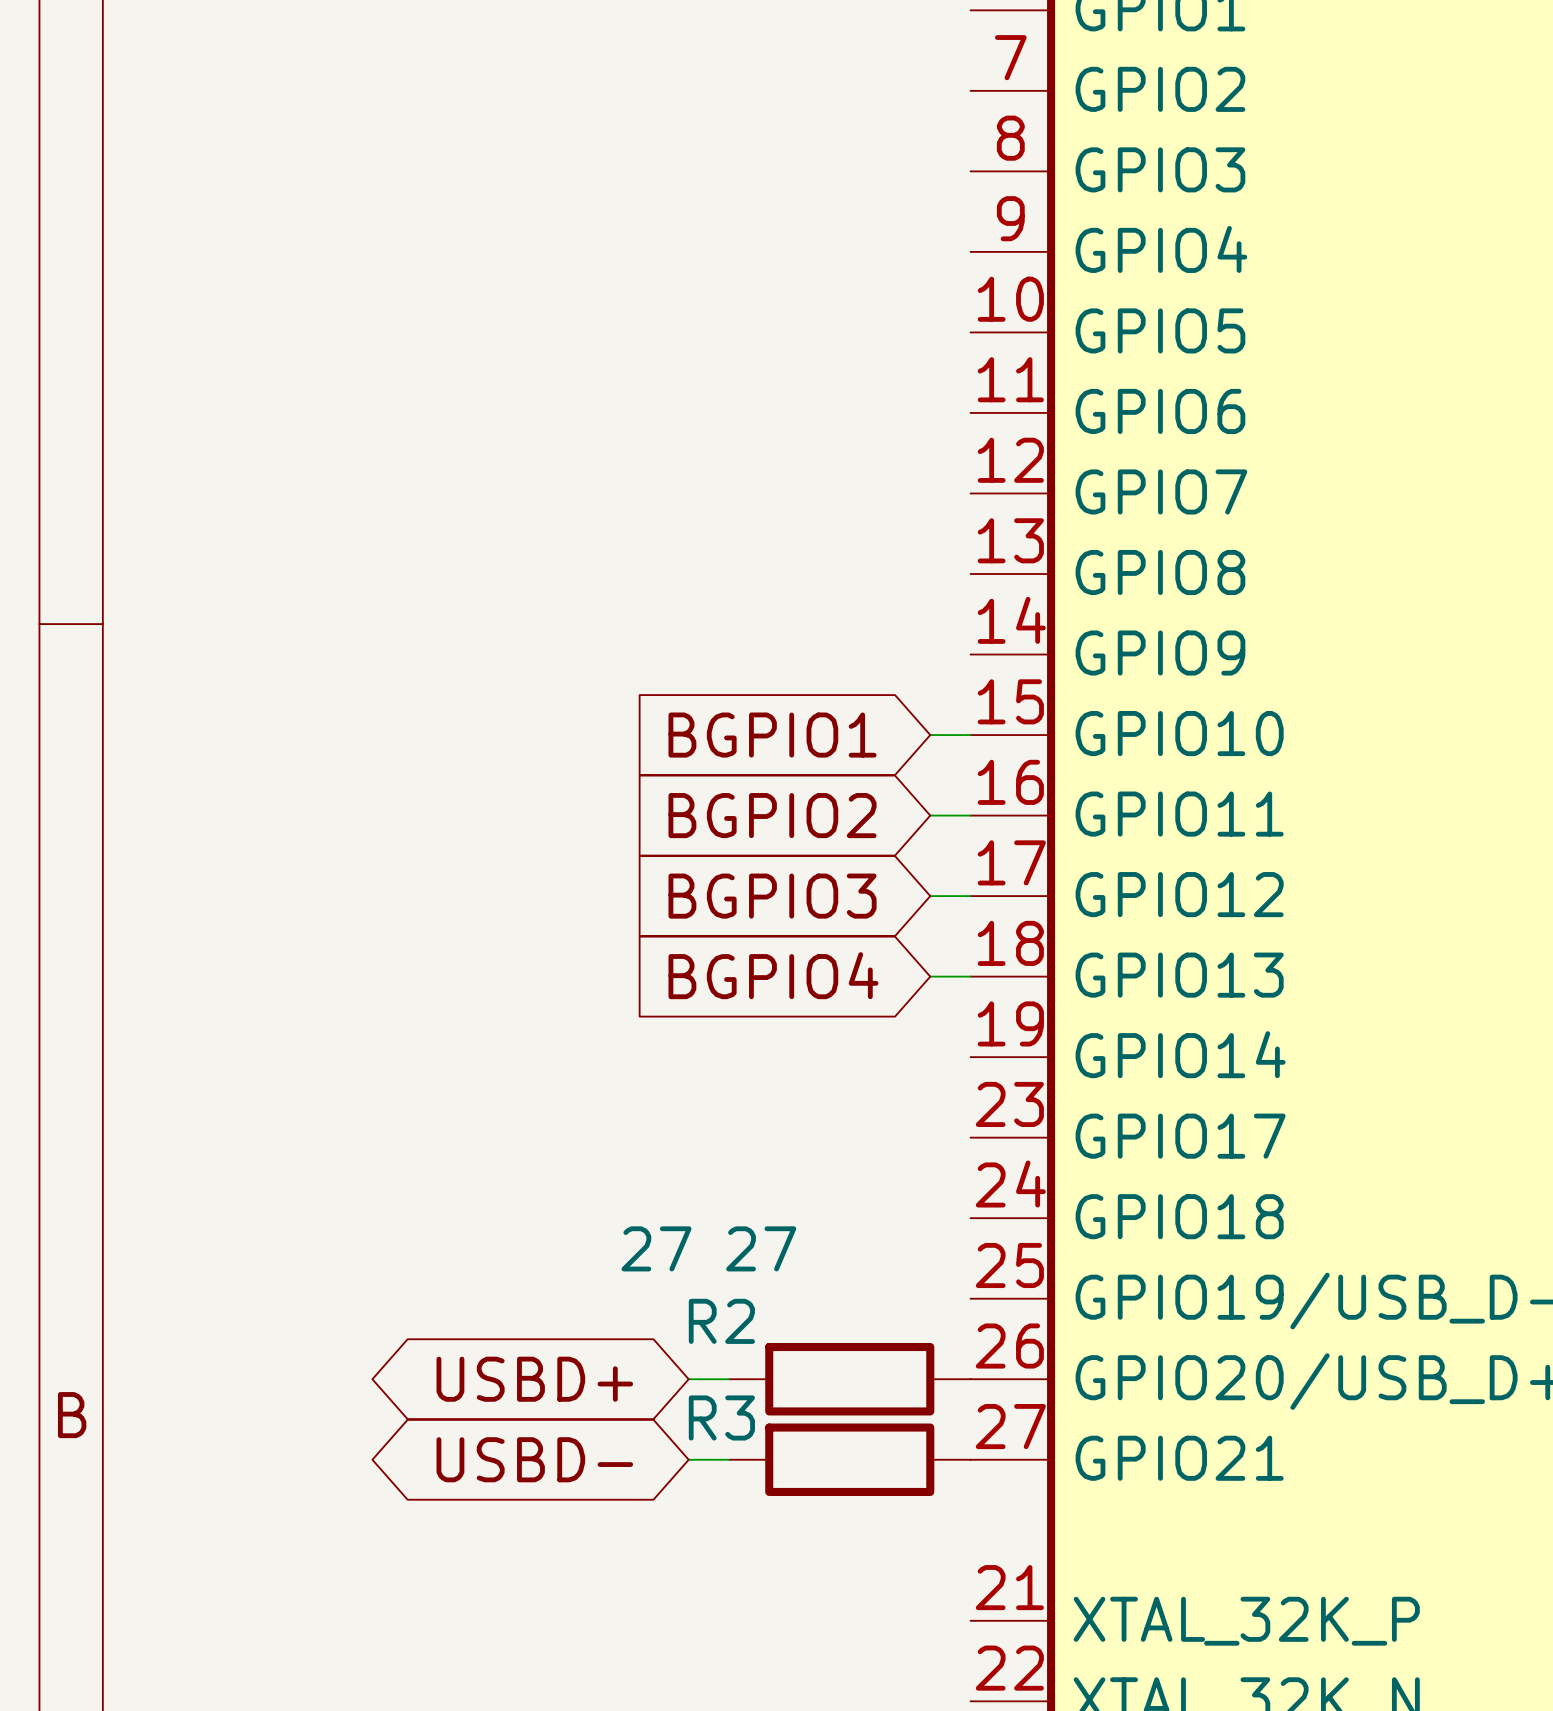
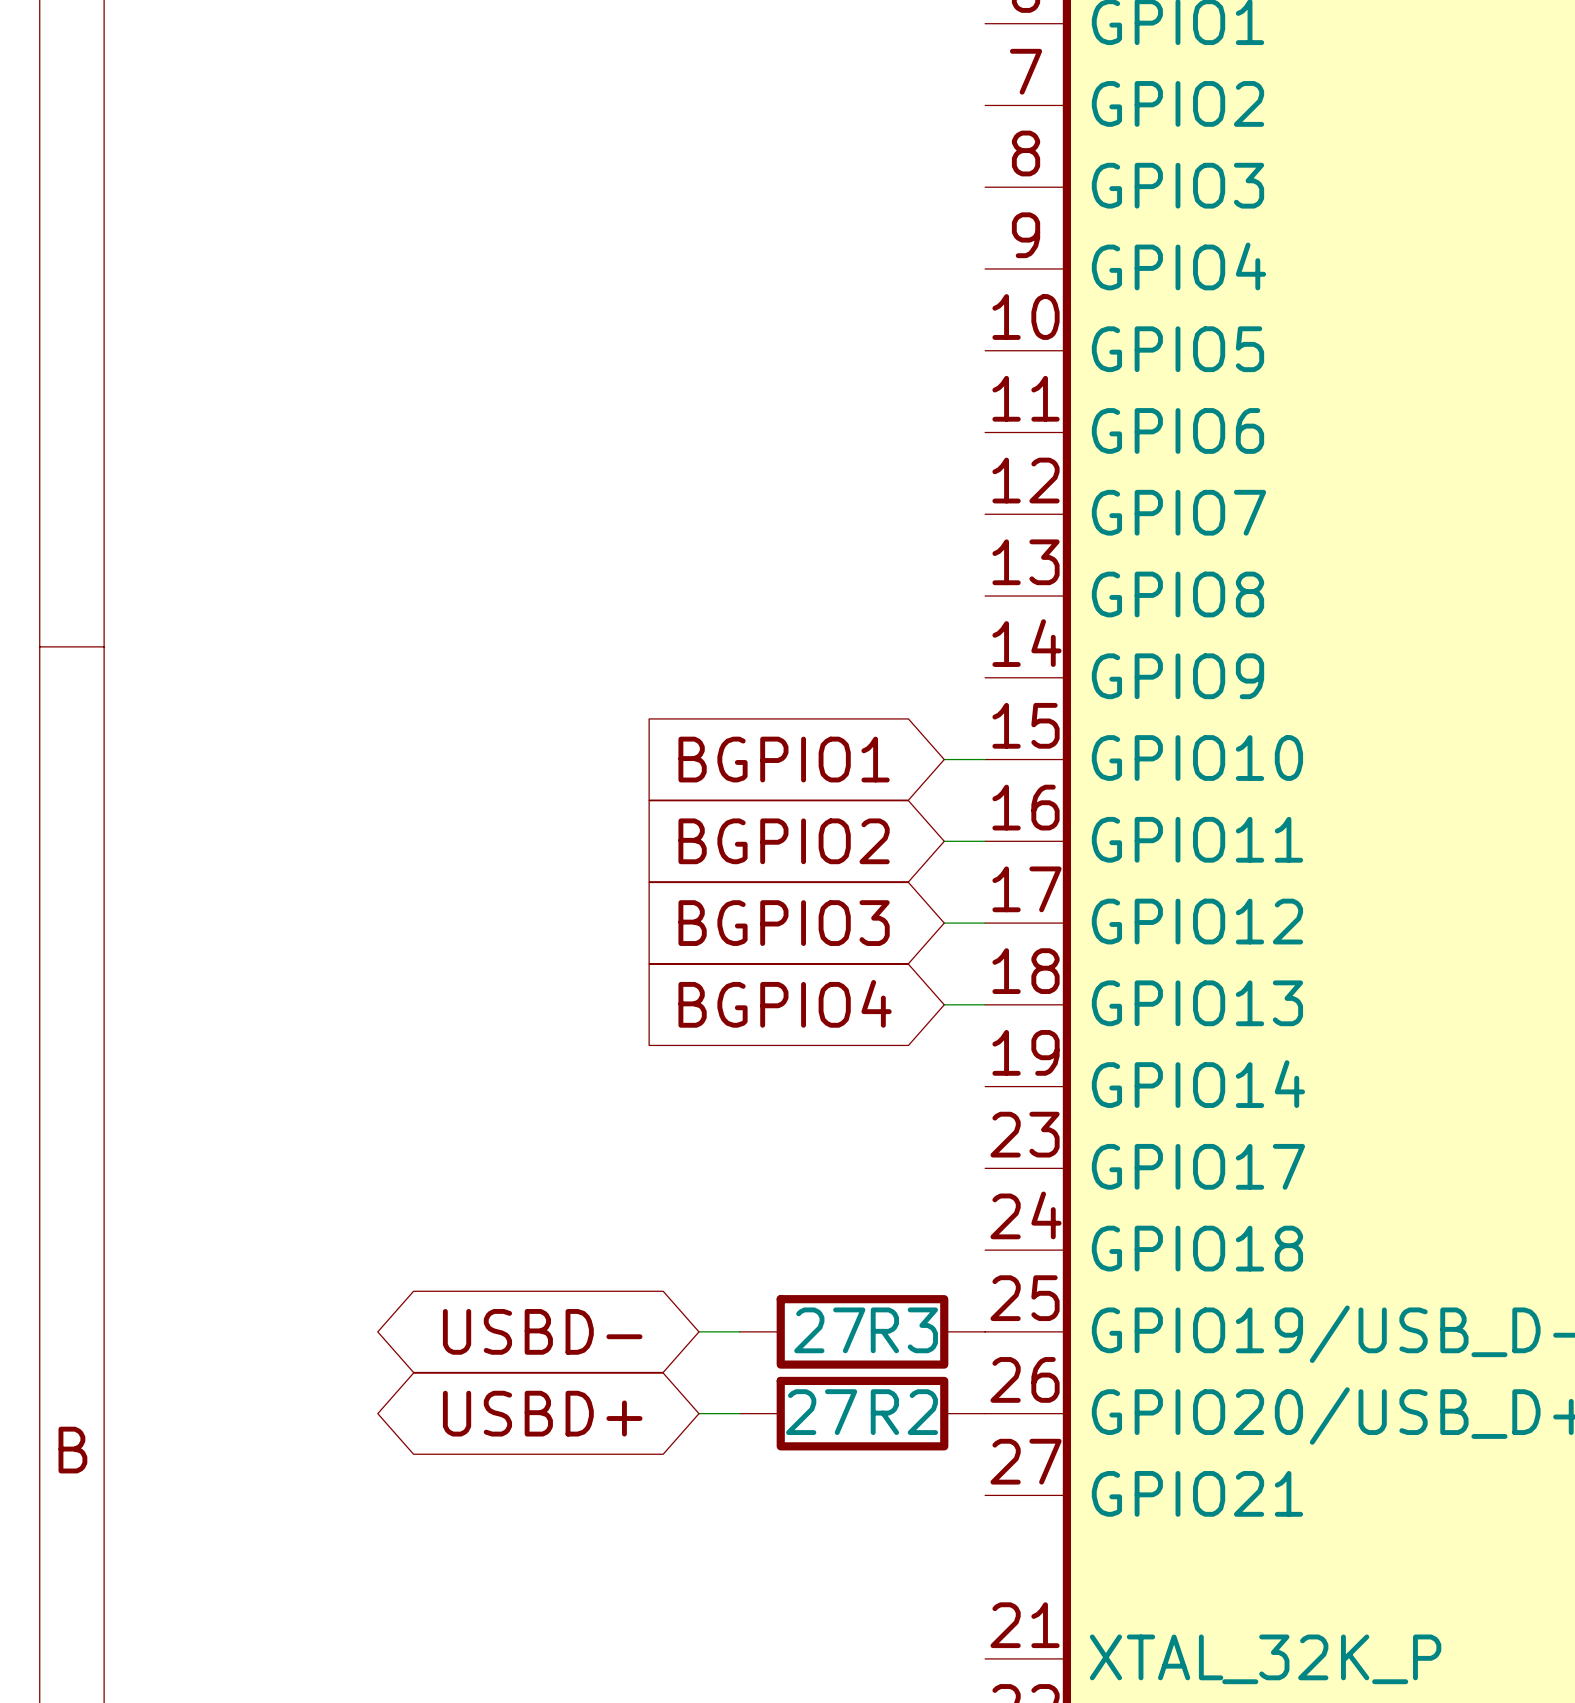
R2 value position: 27 (656, 1248) -> 27 (821, 1412)
R3 value position: 27 (761, 1248) -> 27 (829, 1330)
R2 name position: R2 (721, 1321) -> R2 (904, 1412)
R3 name position: R3 (721, 1417) -> R3 (904, 1330)
global label position: USBD- (534, 1459) -> USBD- (542, 1331)
wire: (688, 1459) (728, 1459) -> (698, 1331) (739, 1331)
R3 position: (849, 1459) -> (862, 1331)

